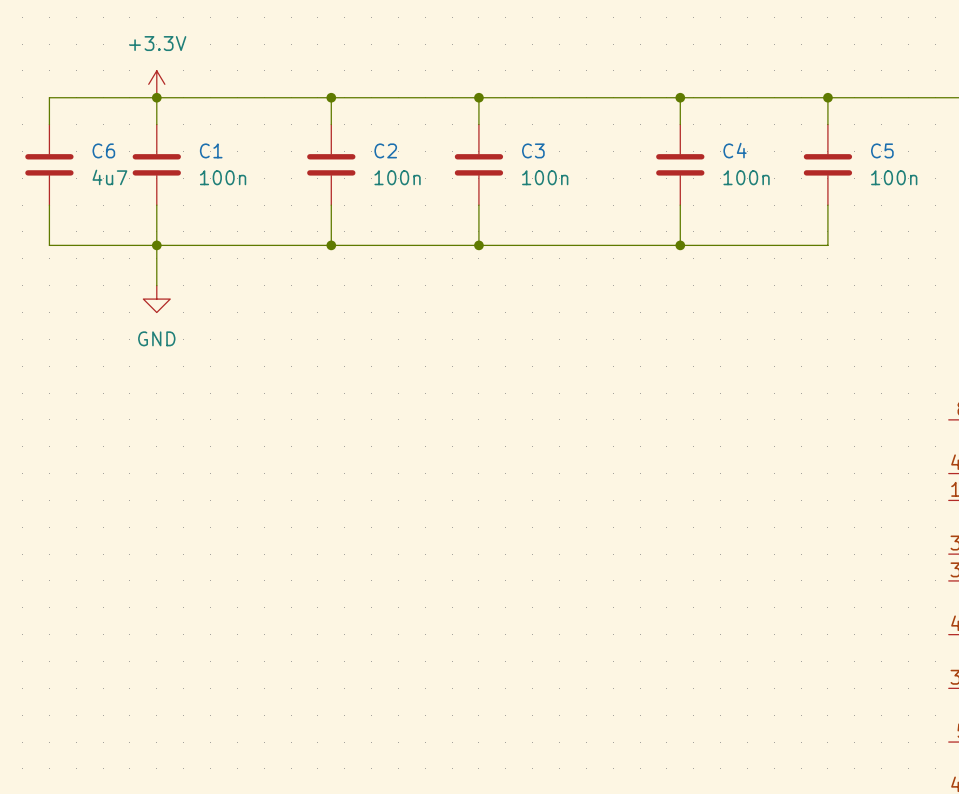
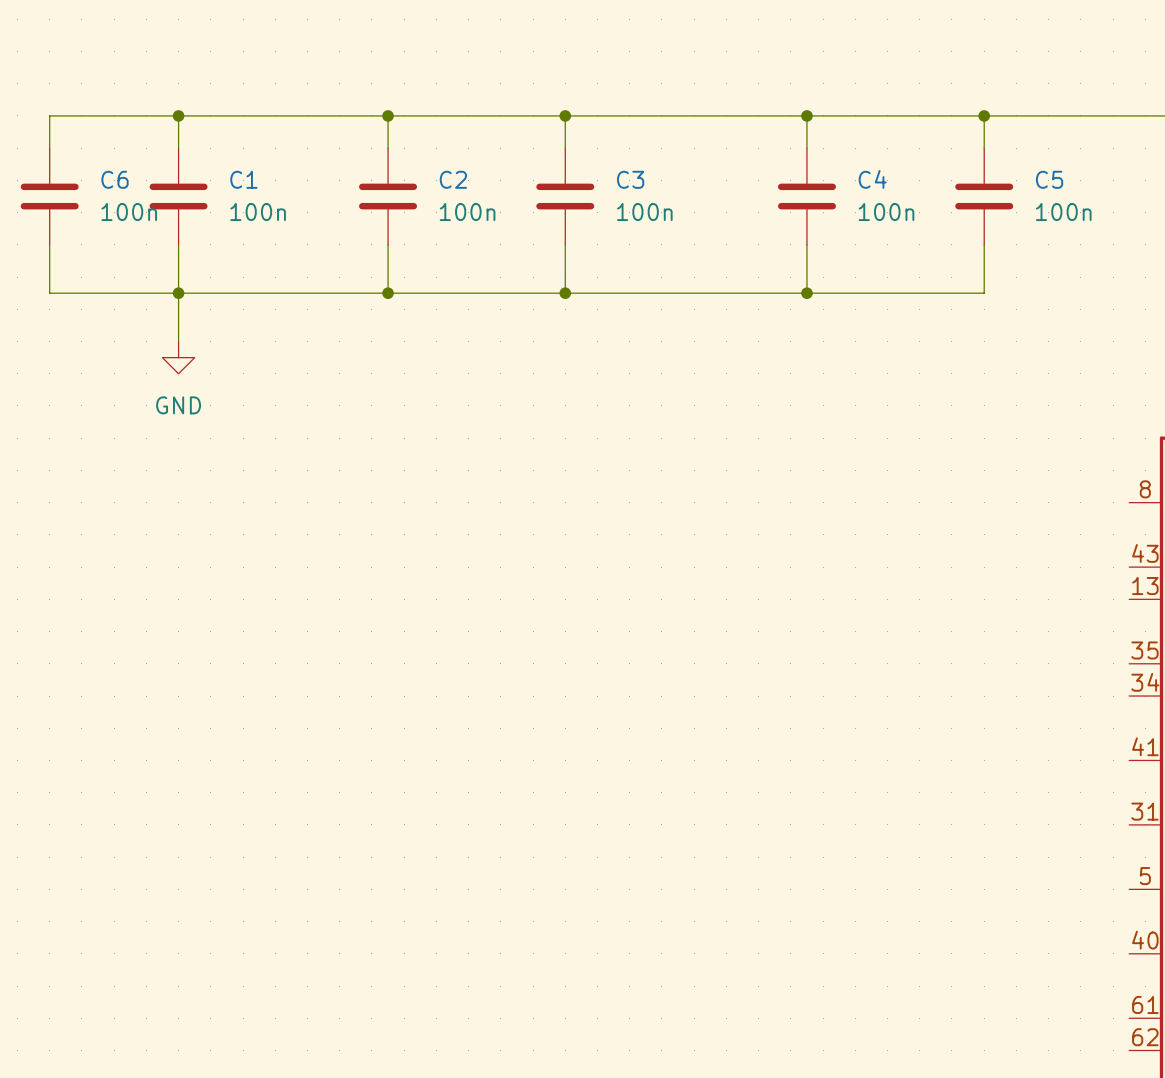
power symbol: +3.3V (156, 84) -> none
C6 value: 4u7 (109, 177) -> 100n (129, 212)

